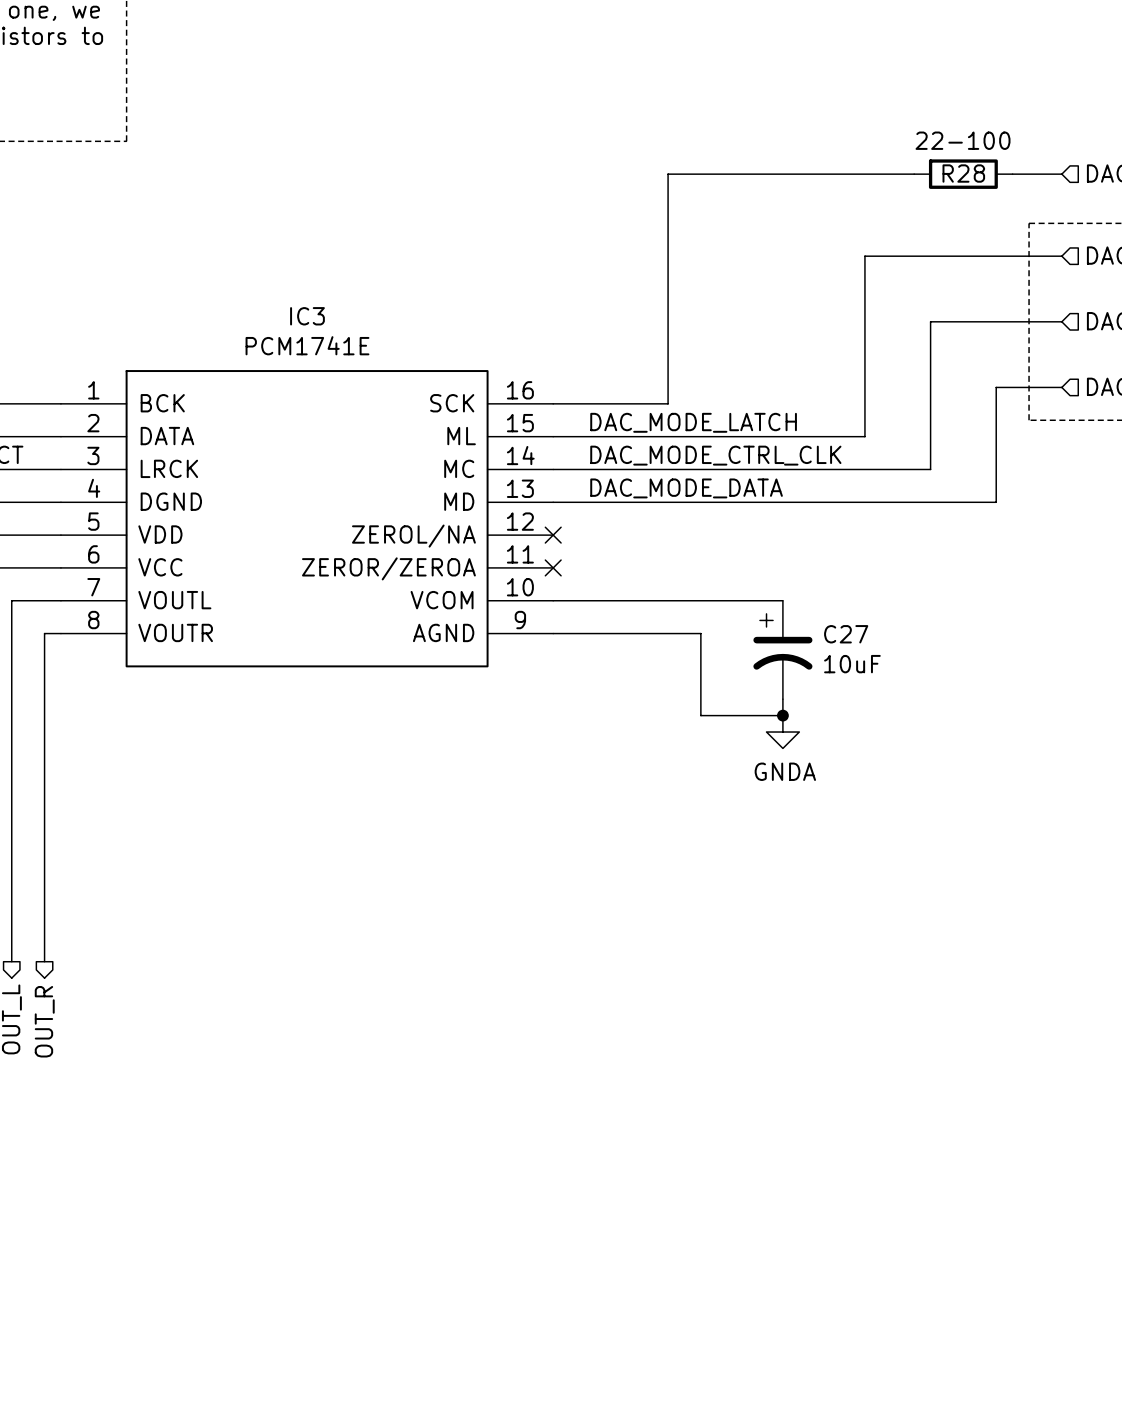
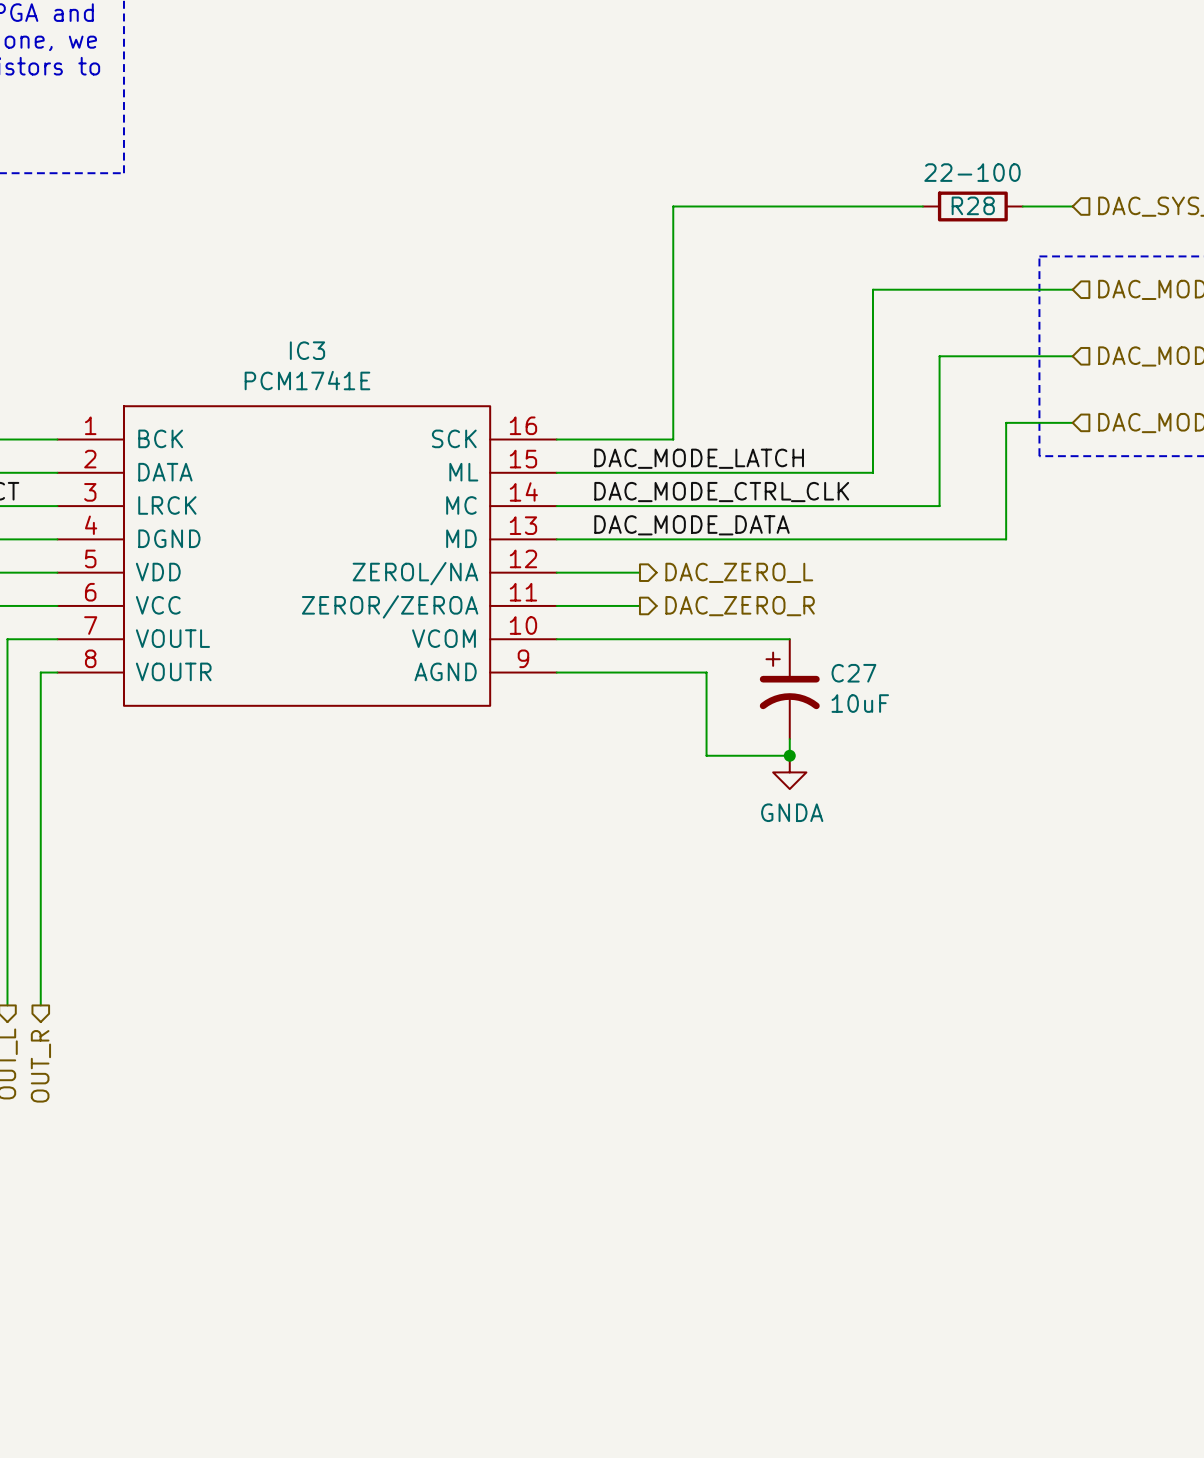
wire: none -> (556, 572) (639, 572)
no-connect mark: (553, 535) -> none
hierarchical label: none -> DAC_ZERO_L (739, 572)
wire: none -> (556, 605) (639, 605)
no-connect mark: (553, 567) -> none
hierarchical label: none -> DAC_ZERO_R (740, 606)

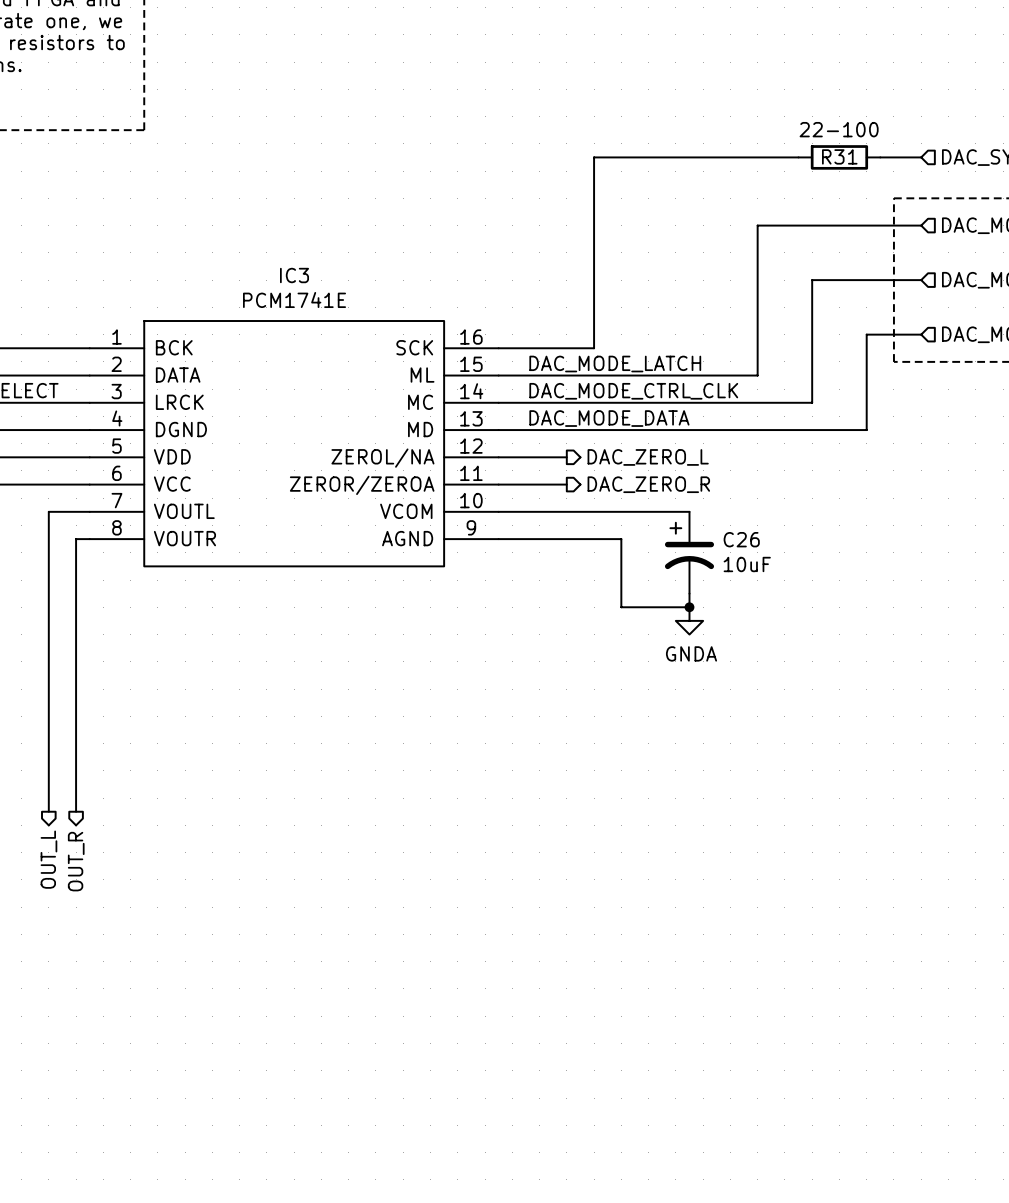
R28 name: R28 (973, 205) -> R31 (839, 156)
C27 name: C27 (853, 673) -> C26 (741, 539)

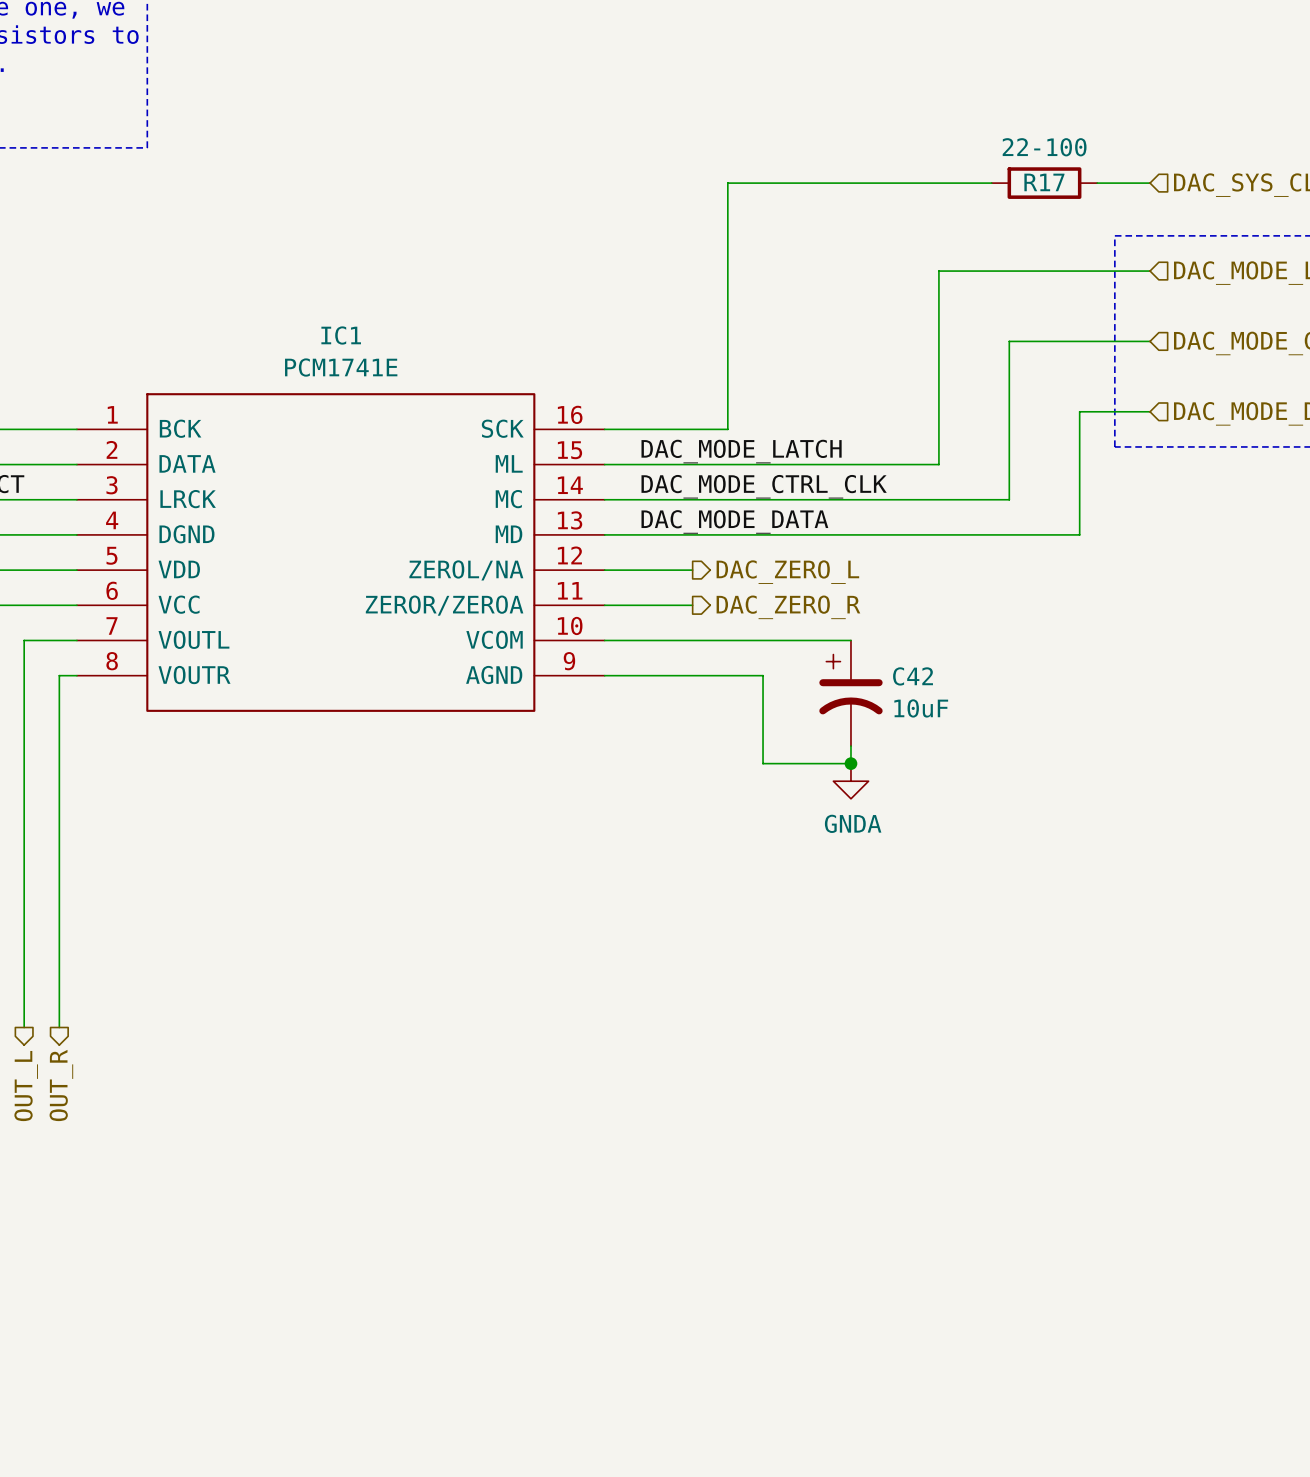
R31 name: R31 (839, 156) -> R17 (1044, 182)
IC3 name: IC3 (294, 275) -> IC1 (341, 335)
C26 name: C26 (741, 539) -> C42 (913, 676)

